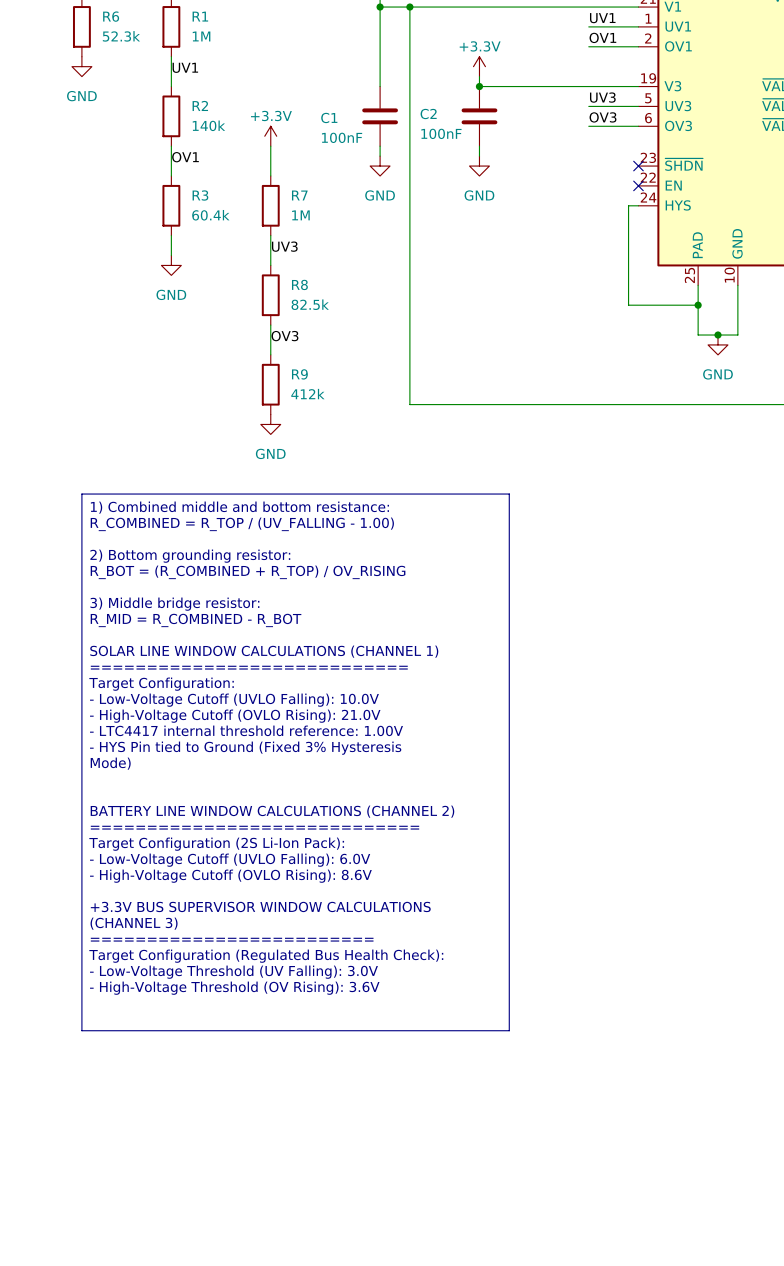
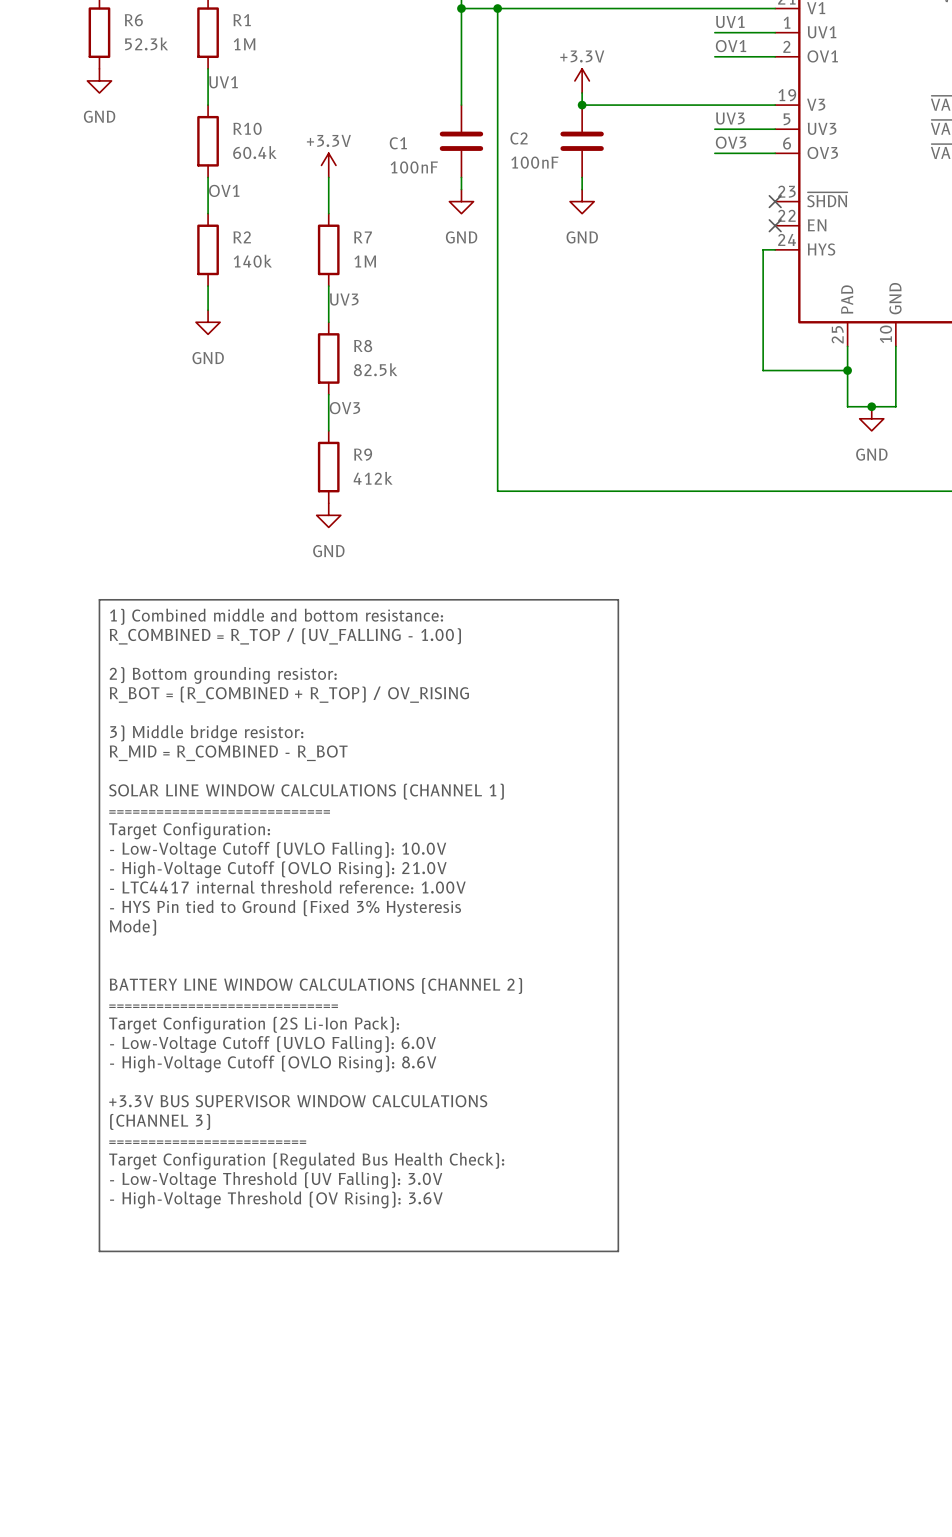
R2 name: R2 (200, 105) -> R10 (247, 128)
R2 value: 140k (208, 125) -> 60.4k (254, 152)
R3 name: R3 (200, 195) -> R2 (242, 237)
R3 value: 60.4k (210, 215) -> 140k (252, 261)

